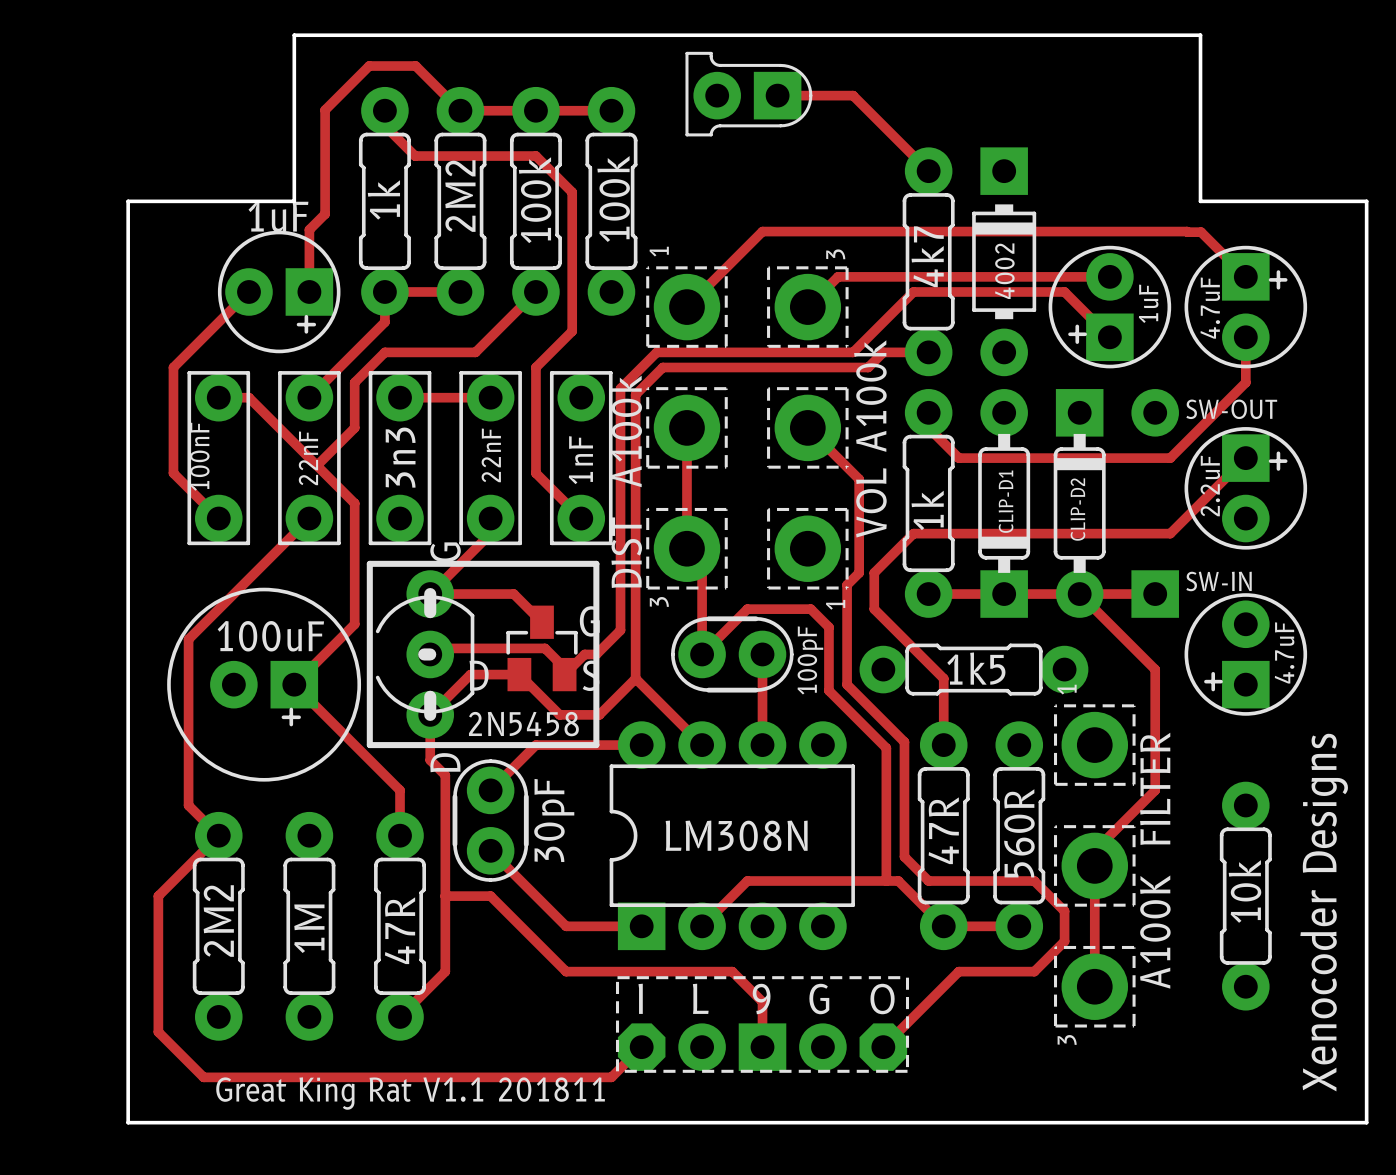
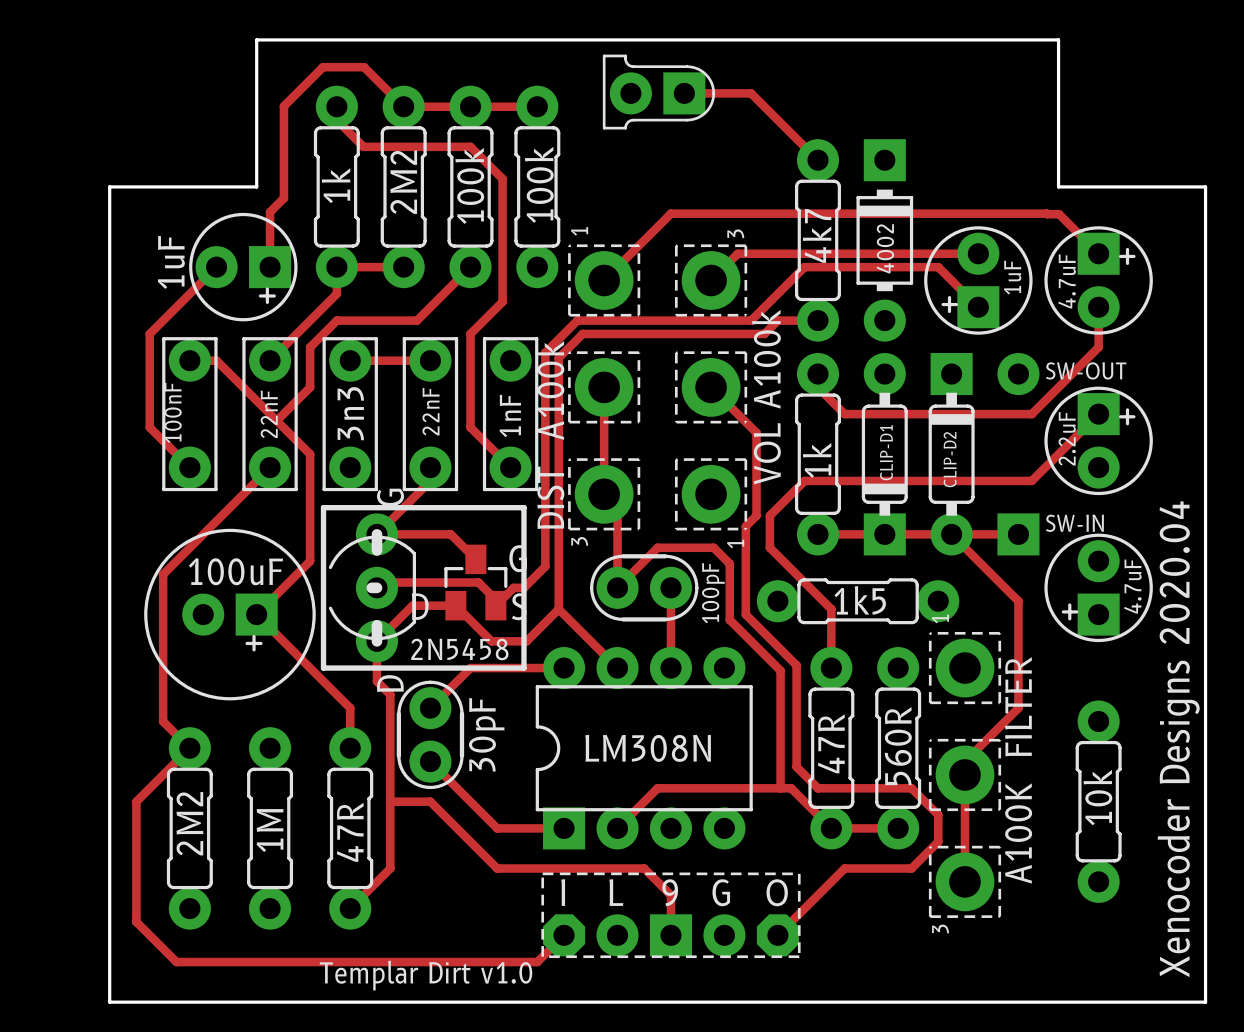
part value rotation: 0° (278, 216) -> 90° counterclockwise (171, 262)
part value position: 1uF (278, 216) -> 1uF (171, 262)
text: Xenocoder Designs (1324, 912) -> Xenocoder Designs 2020.04 (1178, 739)
text: Great King Rat V1.1 201811 (410, 1093) -> Templar Dirt v1.0 (426, 975)

